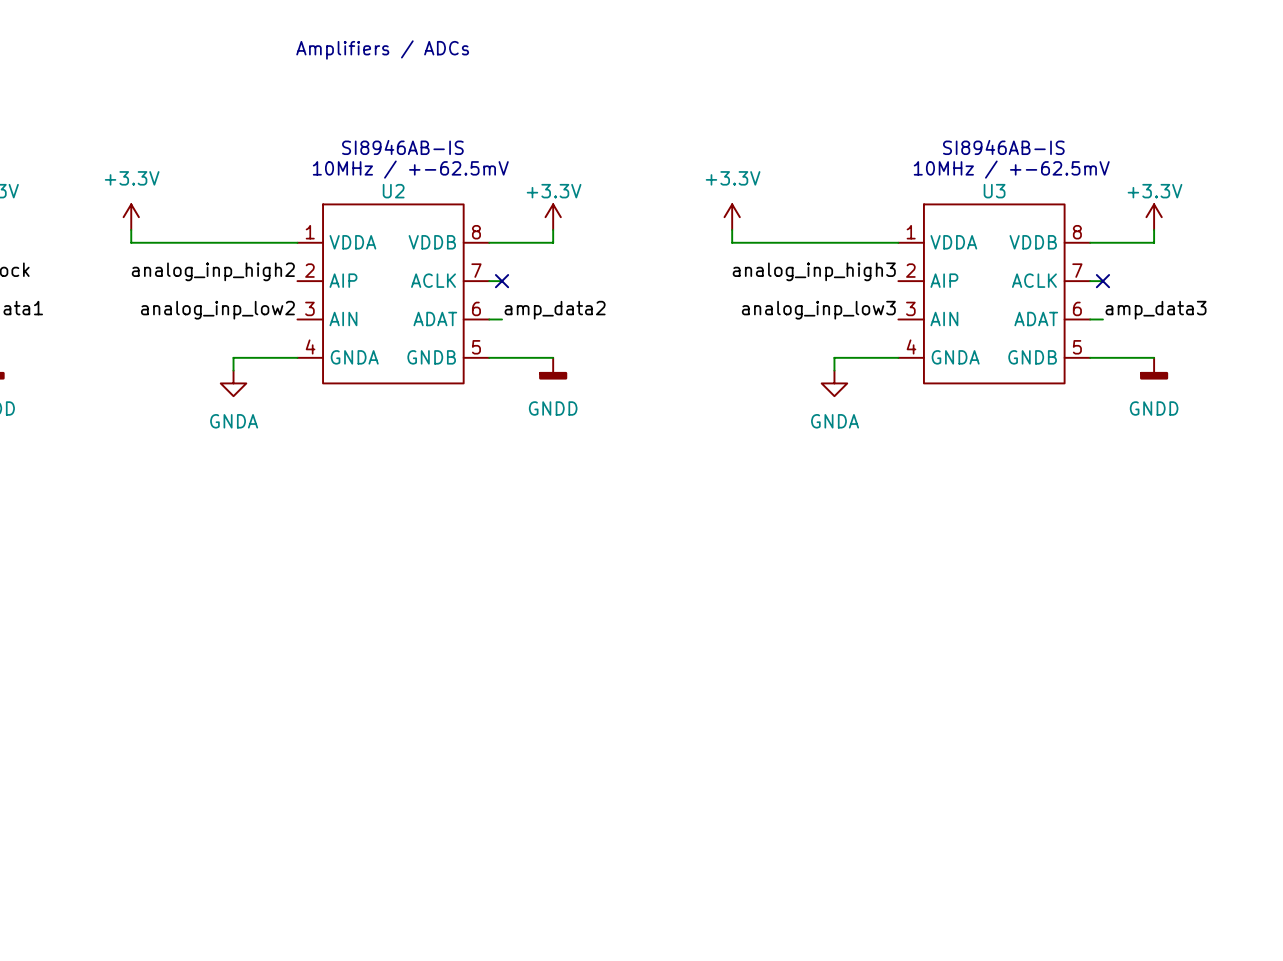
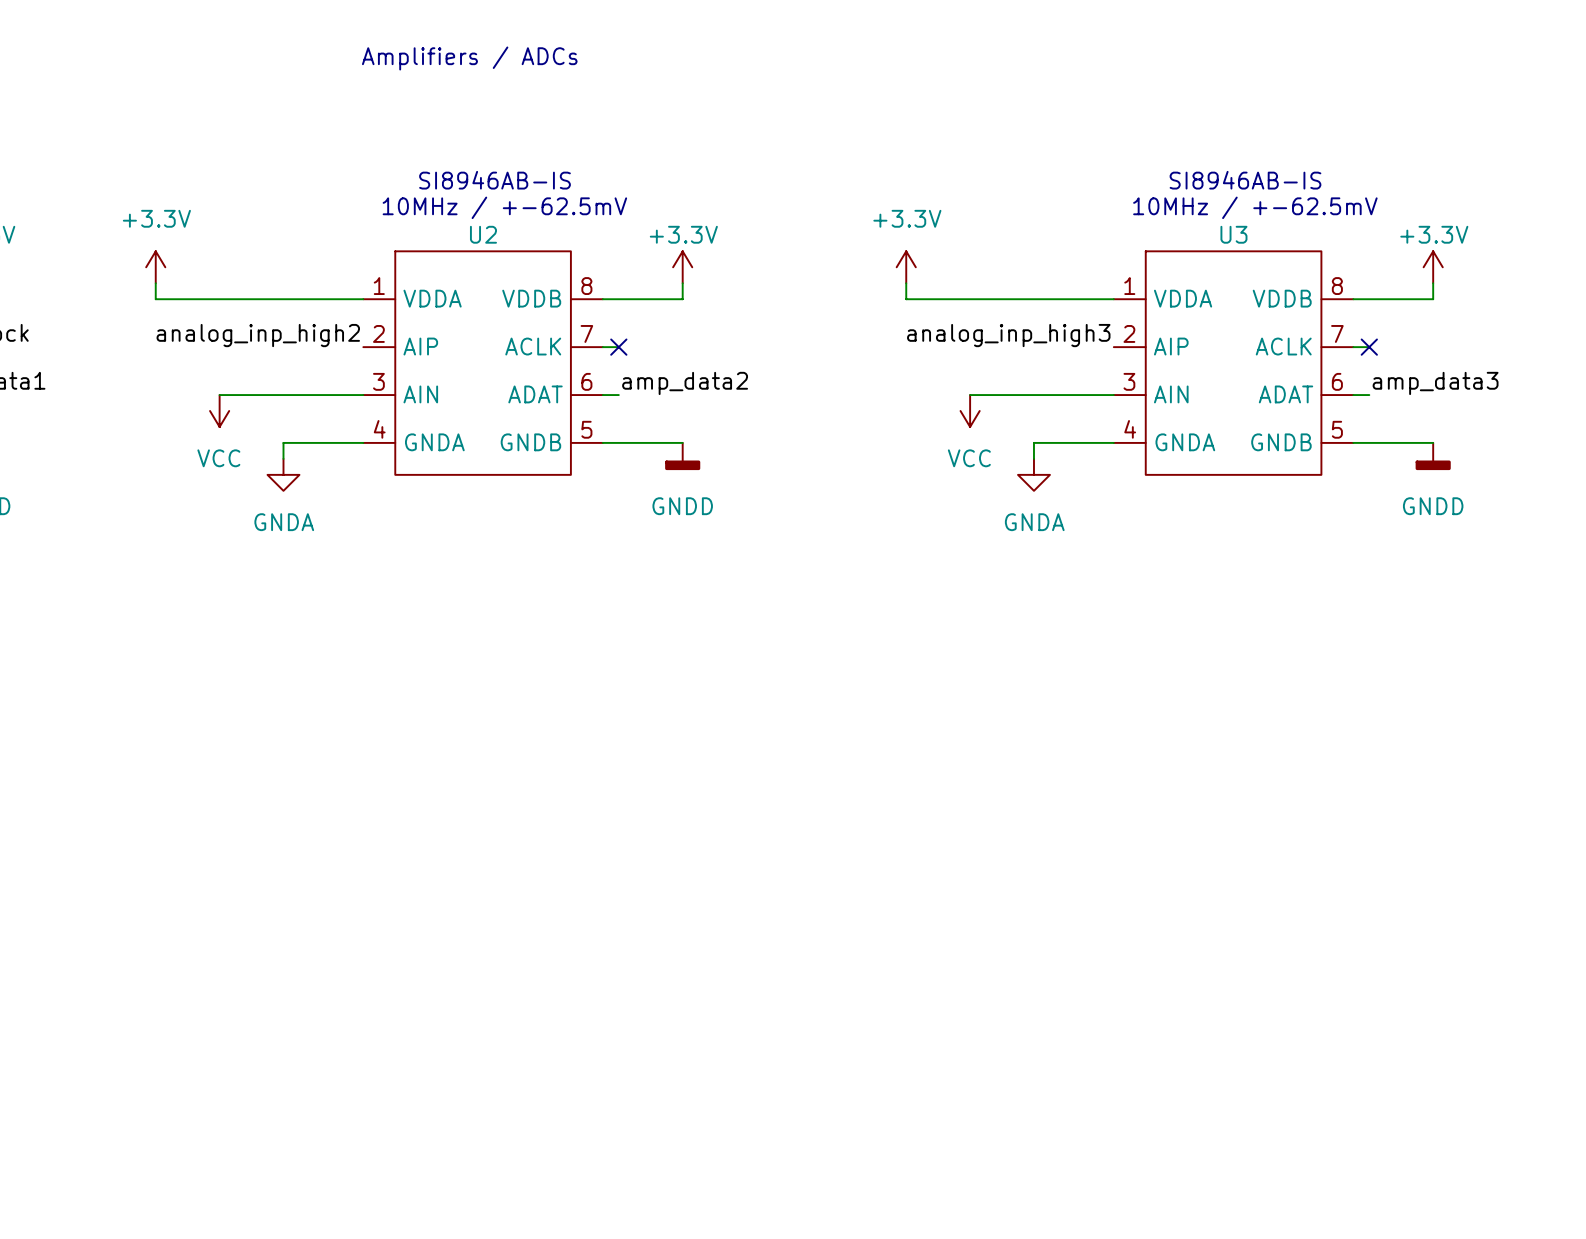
label: analog_inp_low2 (217, 310) -> none
label: analog_inp_low3 (818, 310) -> none
wire: none -> (219, 395) (363, 395)
wire: none -> (970, 395) (1113, 395)
power symbol: none -> VCC (219, 411)
power symbol: none -> VCC (970, 411)

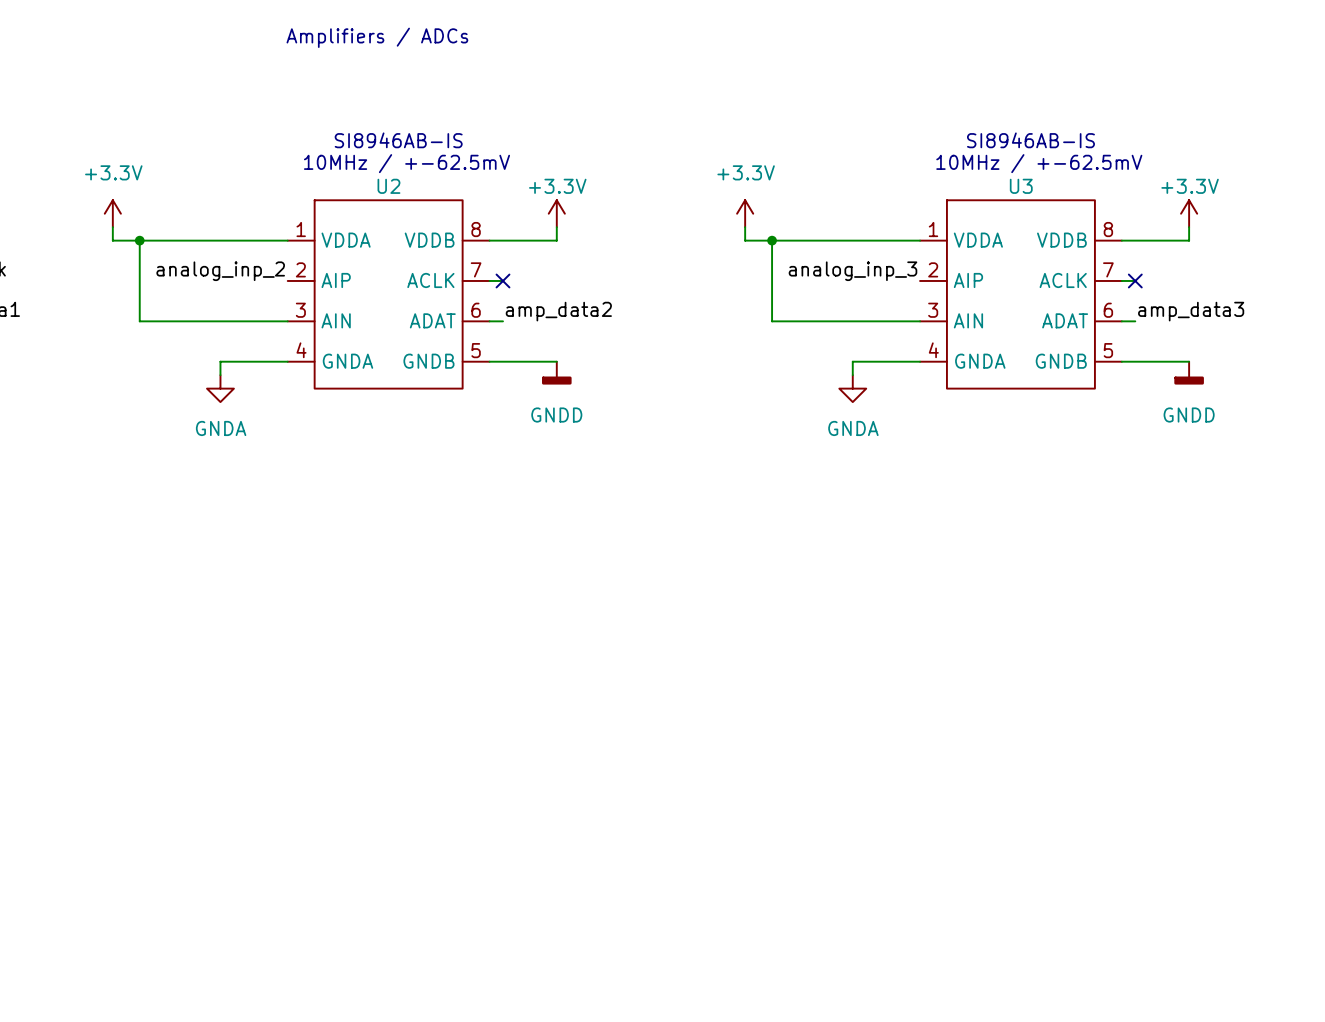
wire: none -> (139, 240) (139, 321) (166, 321)
junction: none -> (139, 240)
wire: none -> (772, 240) (772, 321) (798, 321)
junction: none -> (772, 240)
label: analog_inp_high2 (258, 335) -> analog_inp_2 (220, 271)
label: analog_inp_high3 (1008, 335) -> analog_inp_3 (853, 271)
power symbol: VCC (219, 411) -> none
power symbol: VCC (970, 411) -> none

